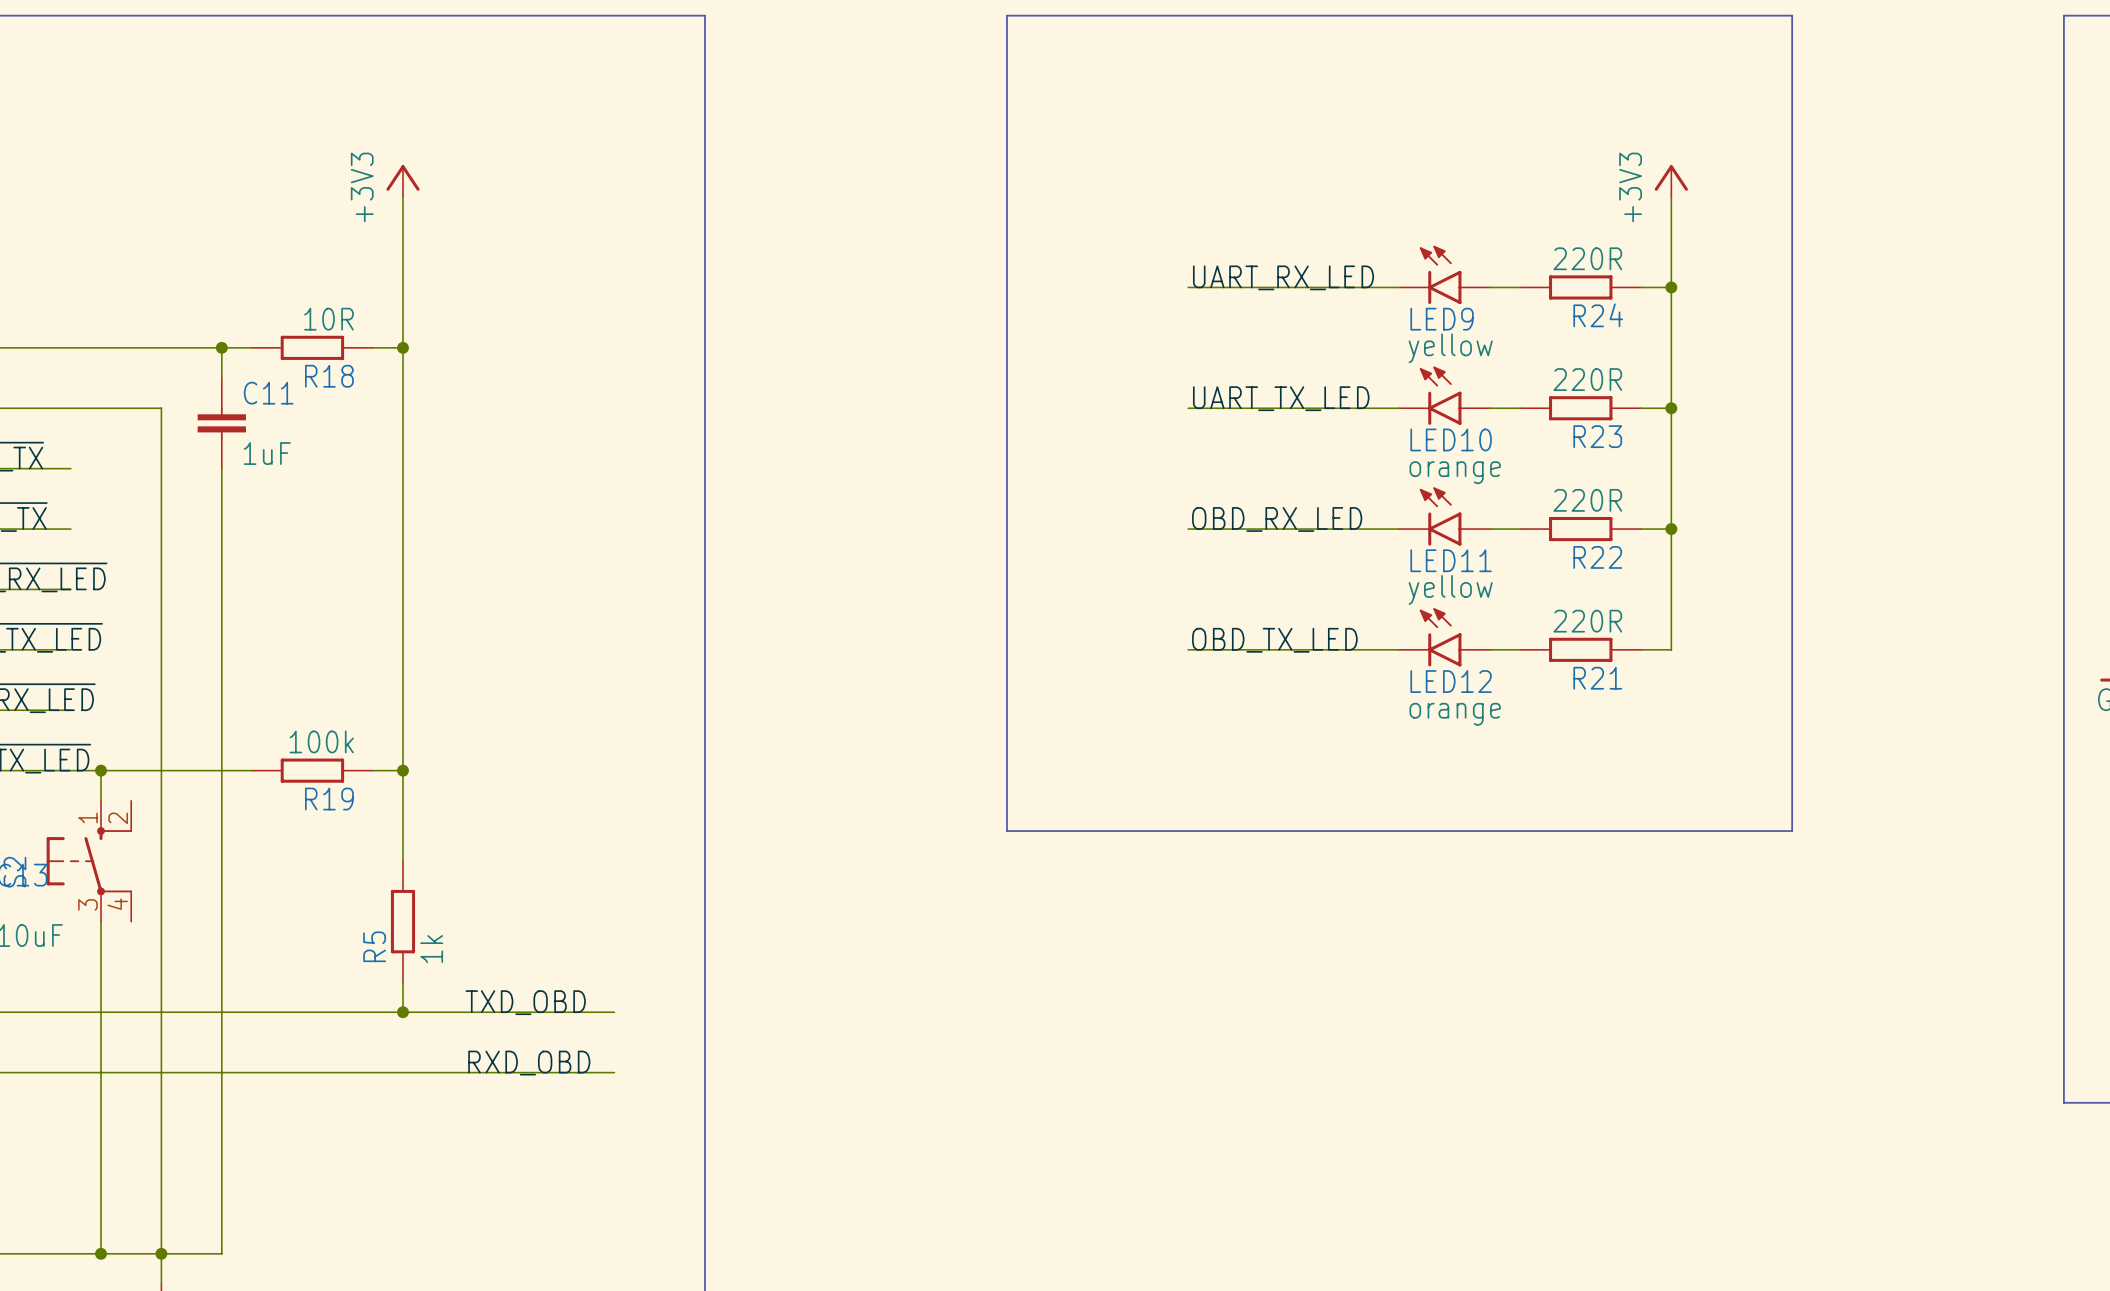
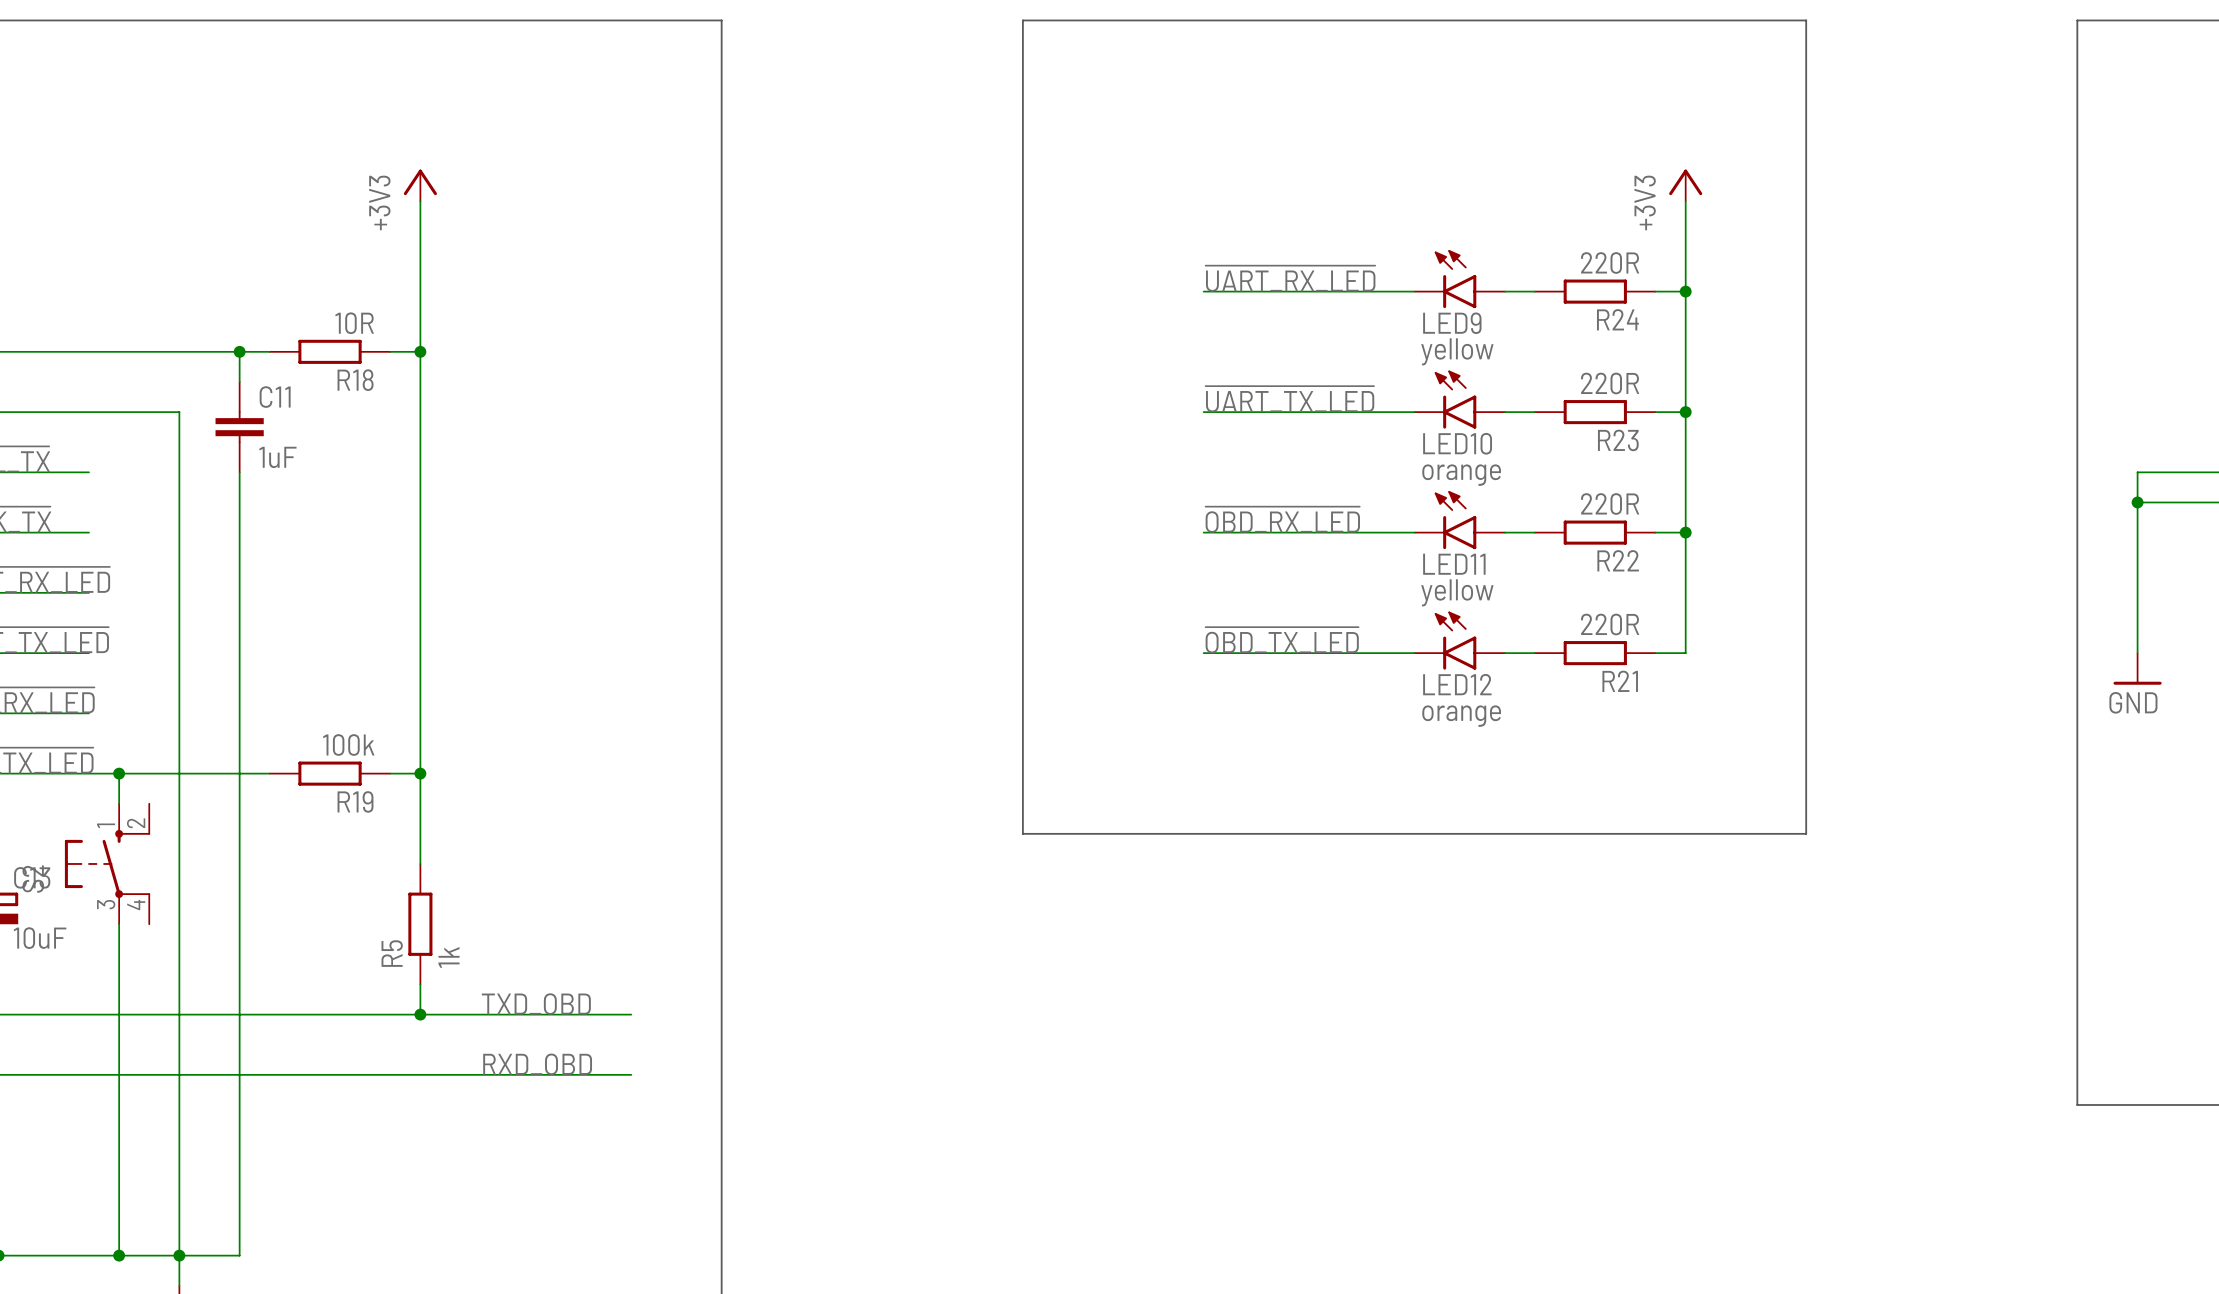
label: UART_RX_LED (1283, 277) -> ~{UART_RX_LED} (1290, 278)
label: UART_TX_LED (1281, 398) -> ~{UART_TX_LED} (1289, 399)
label: OBD_RX_LED (1277, 519) -> ~{OBD_RX_LED} (1282, 519)
label: OBD_TX_LED (1274, 640) -> ~{OBD_TX_LED} (1282, 640)

